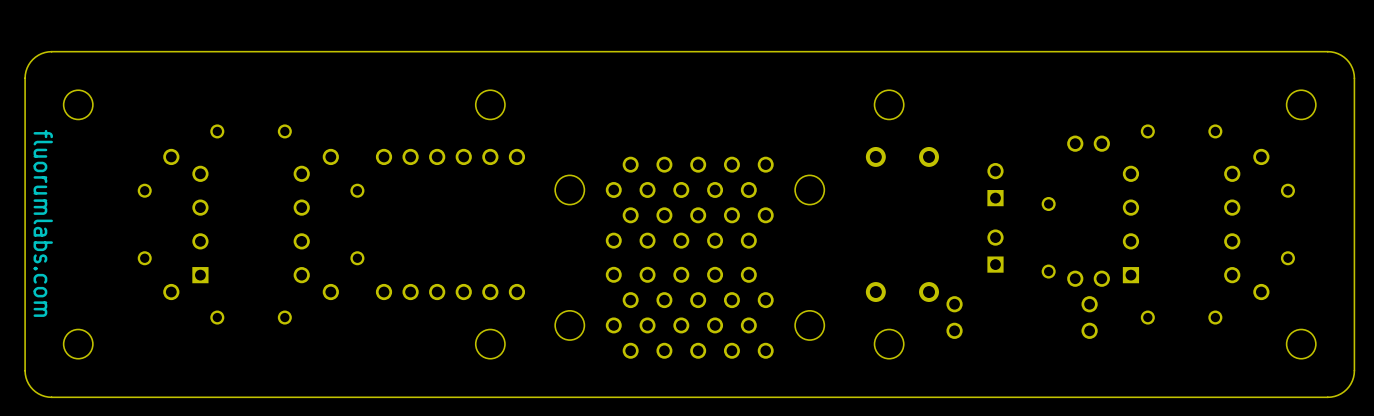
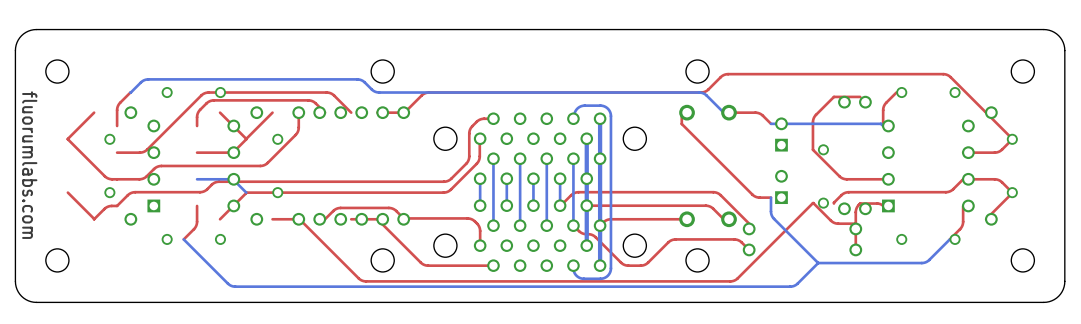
bottom track: none -> (130, 92) (141, 81) (148, 79) (357, 79) (379, 92) (700, 92) (705, 94) (723, 112)
top track: none -> (130, 92) (117, 106) (117, 125)
top track: none -> (896, 92) (883, 106) (883, 125)
top track: none -> (860, 96) (833, 96) (816, 114) (813, 120) (812, 149) (842, 178) (883, 179)
top track: none -> (220, 112) (246, 138)
top track: none -> (272, 112) (246, 138)
top track: none -> (298, 112) (297, 132) (264, 165) (160, 166) (144, 177) (139, 179) (106, 177) (67, 139) (94, 112)
top track: none -> (324, 112) (314, 102) (309, 100) (212, 100) (207, 102) (198, 111) (197, 125)
top track: none -> (351, 112) (333, 94) (328, 92) (207, 92) (201, 95) (145, 151) (117, 152)
top track: none -> (377, 112) (404, 112) (422, 94) (427, 92) (701, 92) (707, 90) (721, 76) (726, 74) (944, 74) (950, 77) (1012, 138) (997, 152) (963, 152)
top track: none -> (681, 112) (681, 124) (752, 194) (758, 197) (770, 197)
top track: none -> (723, 112) (758, 113) (770, 123)
top track: none -> (493, 118) (480, 119) (471, 127) (469, 132) (468, 160) (451, 178) (445, 181) (217, 181) (201, 192) (132, 192) (117, 205) (105, 208) (94, 219) (67, 192)
bottom track: none -> (573, 118) (576, 109) (583, 105) (603, 105) (607, 108) (610, 114) (610, 271) (603, 278) (582, 278) (575, 274) (573, 265)
bottom track: none -> (600, 118) (600, 265)
bottom track: none -> (770, 123) (881, 123) (883, 125)
top track: none -> (480, 138) (478, 161) (446, 192) (246, 192) (220, 219)
bottom track: none -> (586, 138) (586, 245)
top track: none -> (246, 138) (231, 152) (197, 152)
bottom track: none -> (493, 158) (493, 225)
bottom track: none -> (520, 158) (520, 225)
bottom track: none -> (546, 158) (546, 225)
bottom track: none -> (573, 158) (573, 225)
bottom track: none -> (480, 178) (480, 205)
bottom track: none -> (506, 178) (506, 205)
bottom track: none -> (533, 178) (533, 205)
bottom track: none -> (560, 178) (560, 205)
bottom track: none -> (197, 179) (231, 179) (246, 192)
bottom track: none -> (770, 197) (771, 212) (773, 217) (818, 263)
top track: none -> (833, 203) (842, 194) (847, 192) (947, 192) (952, 190) (963, 179) (997, 179) (1012, 193) (986, 219)
top track: none -> (560, 205) (577, 192) (714, 192) (720, 195) (749, 223)
top track: none -> (586, 205) (707, 205) (712, 207) (723, 219)
top track: none -> (197, 205) (196, 225) (183, 239)
top track: none -> (883, 205) (878, 203) (860, 203) (857, 207) (855, 249)
top track: none -> (963, 205) (962, 225) (949, 239)
top track: none -> (272, 219) (299, 219) (358, 278) (366, 281) (731, 281) (737, 278) (812, 203) (834, 222) (855, 223)
top track: none -> (324, 219) (334, 210) (340, 207) (390, 208) (395, 210) (403, 219) (468, 218) (473, 220) (479, 227) (480, 245)
top track: none -> (351, 219) (377, 219) (425, 265) (493, 265)
top track: none -> (681, 219) (609, 219) (600, 225)
top track: none -> (573, 225) (581, 232) (594, 236) (621, 262) (627, 265) (645, 264) (669, 241) (674, 239) (735, 239) (749, 249)
bottom track: none -> (183, 239) (227, 283) (235, 286) (790, 286) (796, 284) (818, 263)
bottom track: none -> (949, 239) (929, 259) (923, 262) (818, 263)

